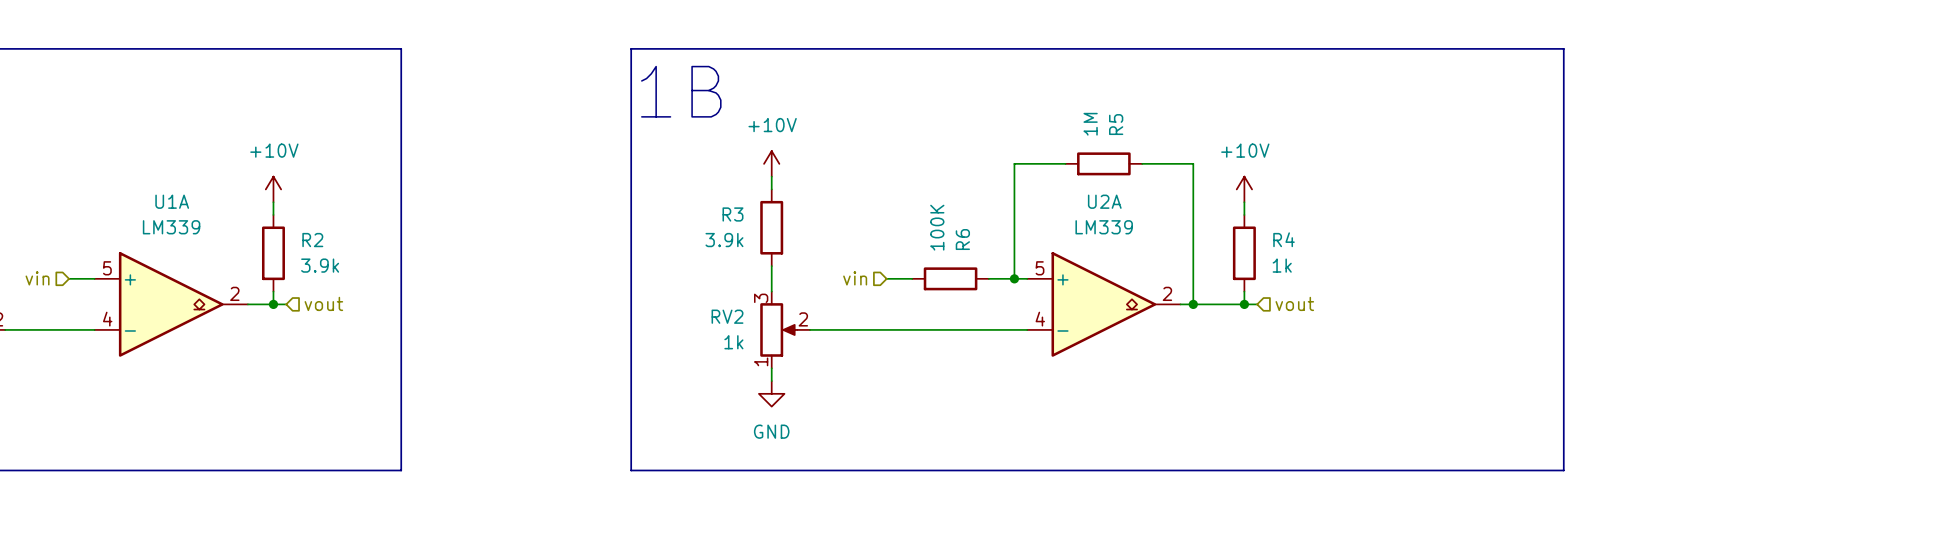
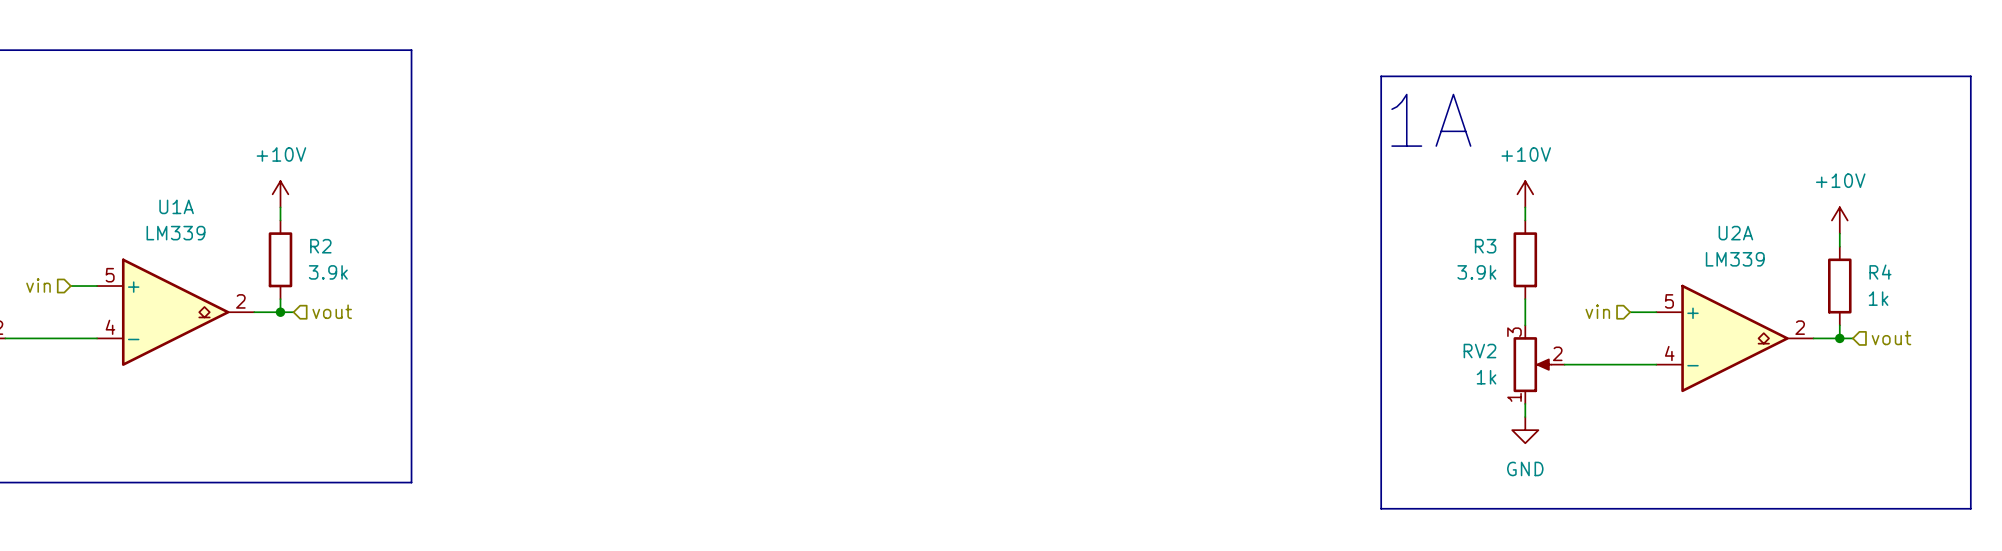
line: (631, 48) (1563, 48) (1563, 470) (631, 470) (631, 48) -> none
line: none -> (1381, 76) (1970, 76) (1970, 508) (1381, 508) (1381, 76)
text: 1B (681, 91) -> none
text: none -> 1A (1431, 120)
power symbol: +10V (771, 163) -> none
wire: (1065, 163) (1014, 163) (1014, 278) -> none
R5: 1M (1103, 163) -> none
wire: (1142, 163) (1193, 163) (1193, 304) -> none
wire: (771, 176) (771, 189) -> none
power symbol position: +10V (1244, 189) -> +10V (1525, 194)
wire: (1244, 202) (1244, 214) -> (1525, 207) (1525, 220)
power symbol: none -> +10V (1839, 220)
R3 position: (771, 227) -> (1525, 259)
wire: none -> (1839, 233) (1839, 246)
R4 position: (1244, 253) -> (1839, 286)
wire: (771, 266) (771, 291) -> none
hierarchical label: vin (855, 278) -> none
wire: (886, 278) (912, 278) -> none
R6: 100K (950, 278) -> none
wire: (988, 278) (1027, 278) -> none
junction: (1014, 278) -> none
wire: (1244, 291) (1244, 304) -> none
wire: none -> (1525, 299) (1525, 325)
hierarchical label: vout (1294, 303) -> none
hierarchical label: none -> vin (1597, 311)
U2A position: (1103, 304) -> (1734, 338)
wire: (1180, 304) (1257, 304) -> none
junction: (1193, 304) -> none
junction: (1244, 304) -> none
wire: none -> (1630, 312) (1656, 312)
wire: none -> (1839, 325) (1839, 338)
RV2 position: (785, 329) -> (1539, 364)
wire: (810, 329) (1027, 329) -> none
wire: none -> (1813, 338) (1852, 338)
junction: none -> (1839, 338)
hierarchical label: none -> vout (1891, 337)
wire: none -> (1564, 364) (1656, 364)
wire: (771, 368) (771, 381) -> none
power symbol: GND (771, 393) -> none
wire: none -> (1525, 403) (1525, 417)
power symbol: none -> GND (1525, 430)

